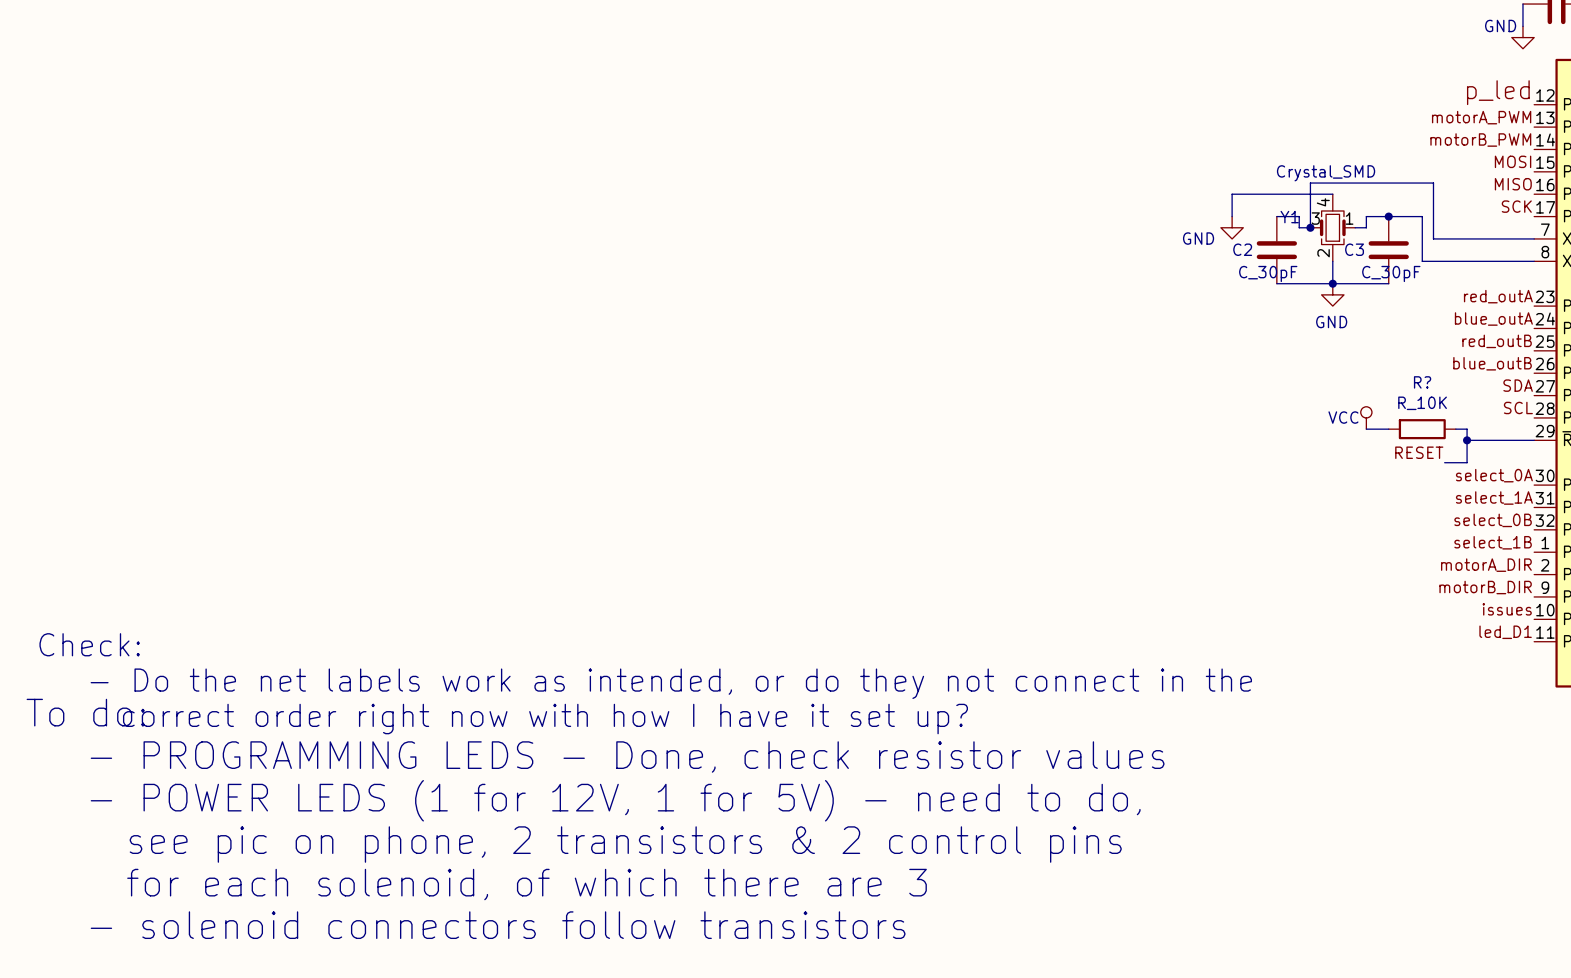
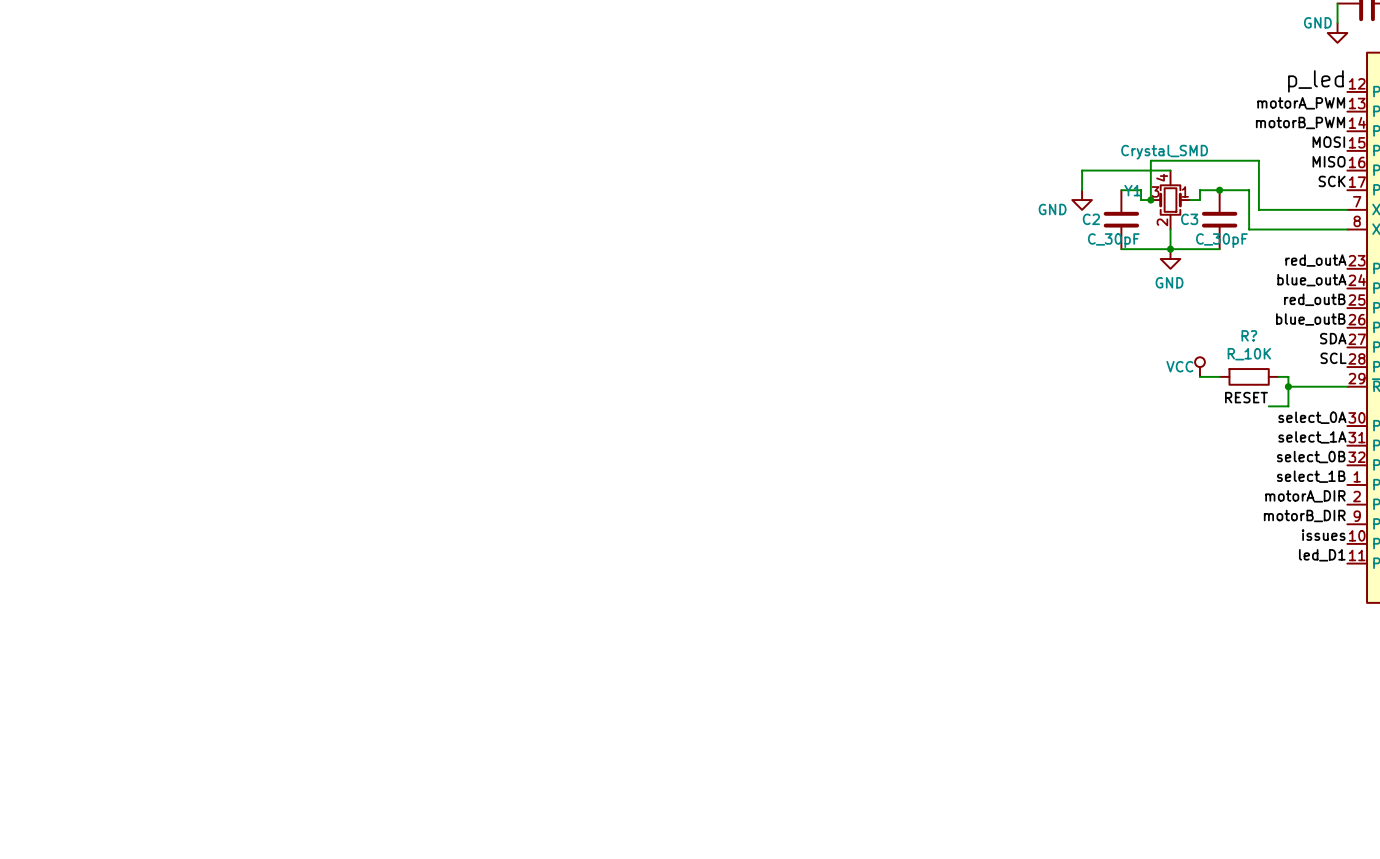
text: Check: (89, 644) -> none
text: - Do the net labels work as intended, or do they not connect in the (671, 683) -> none
text: To do: (85, 712) -> none
text: correct order right now with how I have it set up? (545, 719) -> none
text: - PROGRAMMING LEDS - Done, check resistor values (627, 757) -> none
text: - POWER LEDS (1 for 12V, 1 for 5V) - need to do, (615, 800) -> none
text: see pic on phone, 2 transistors & 2 control pins (625, 844) -> none
text: for each solenoid, of which there are 3 (527, 884) -> none
text: - solenoid connectors follow transistors (498, 925) -> none

